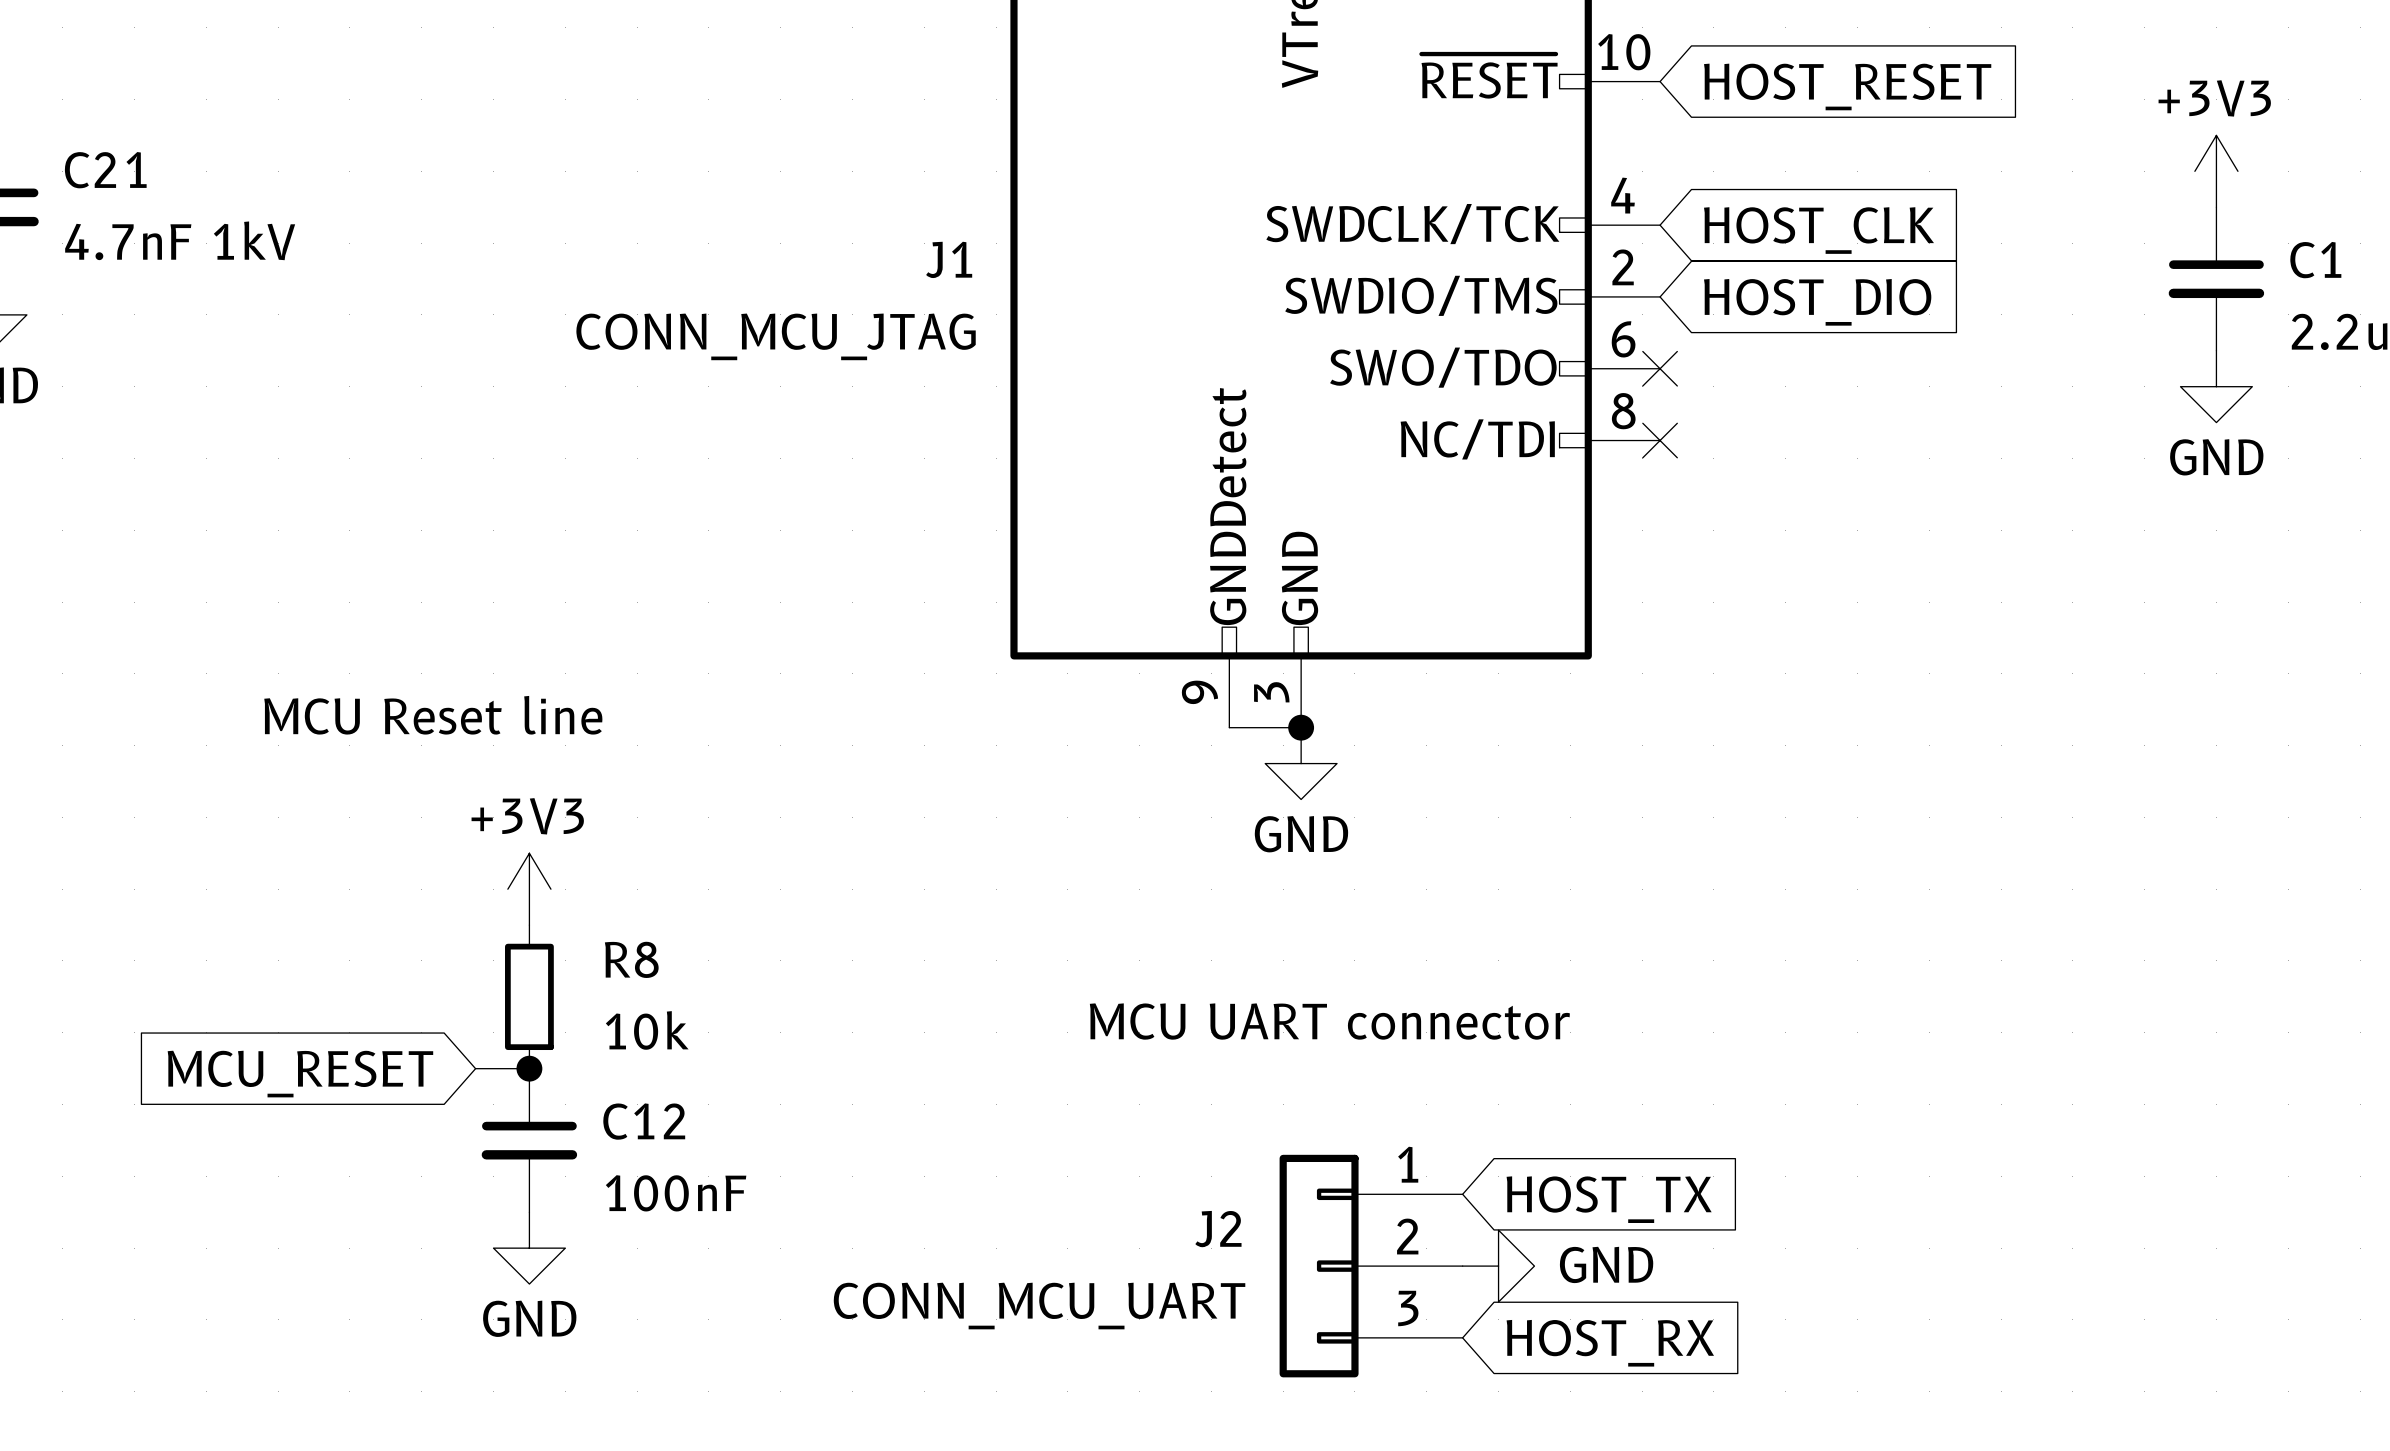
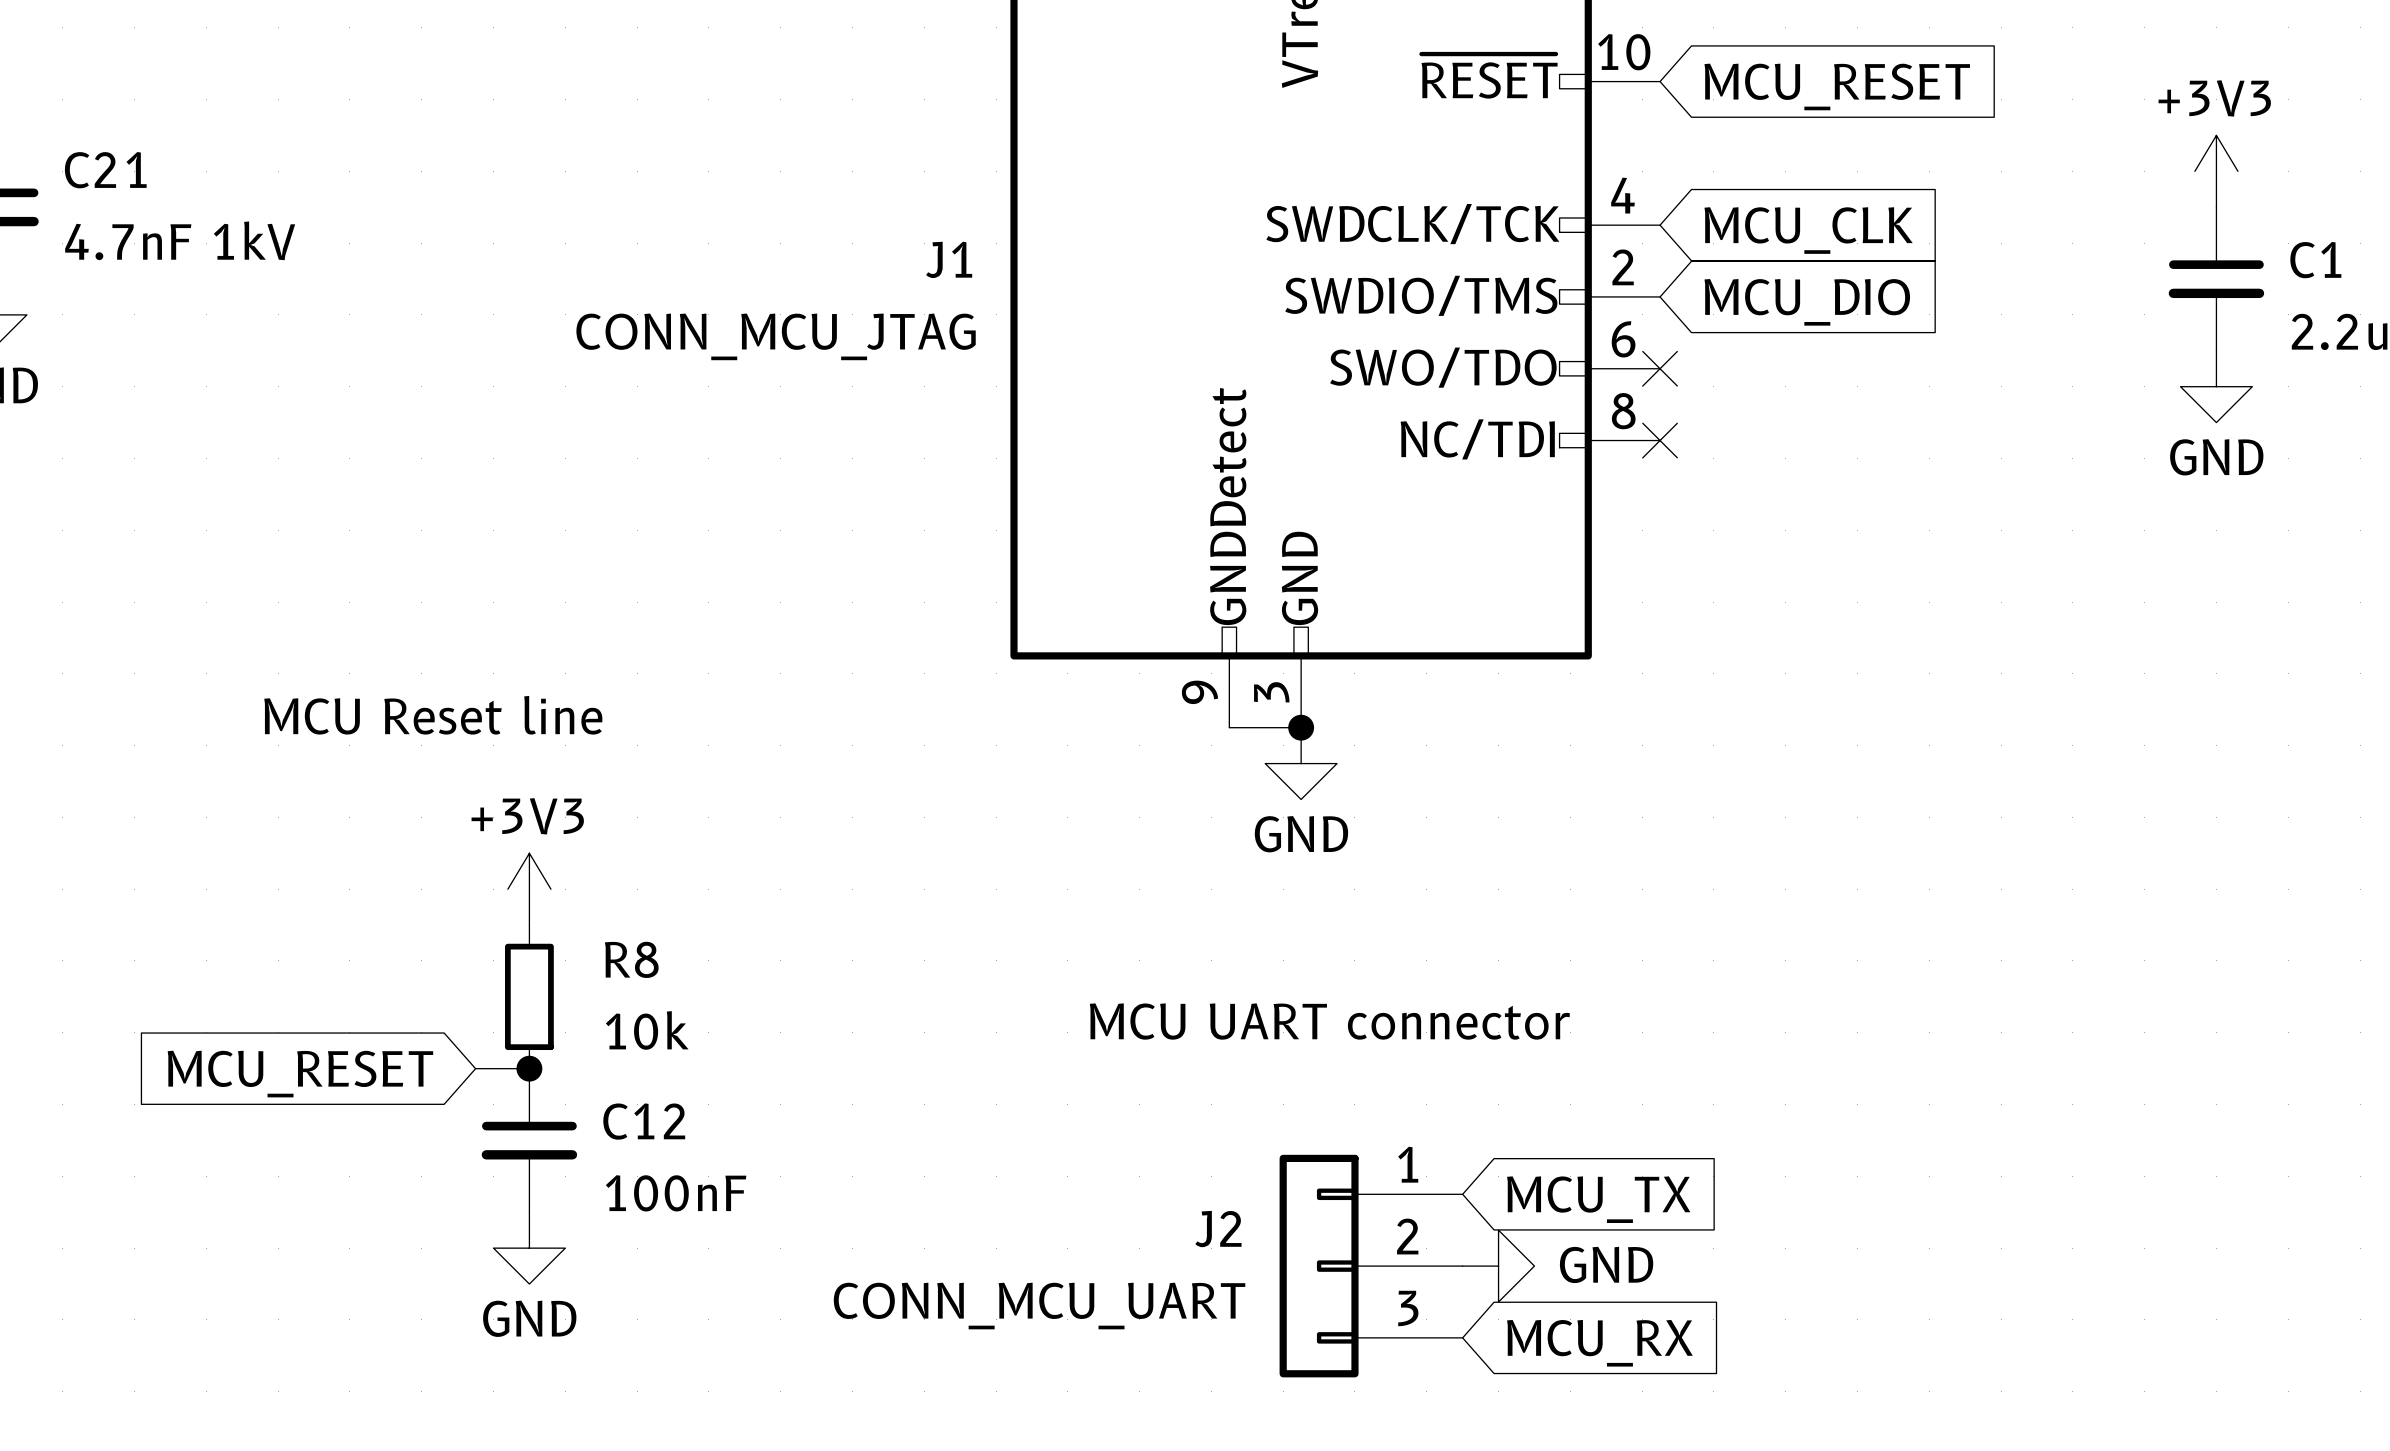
global label: HOST_RESET (1847, 86) -> MCU_RESET (1837, 86)
global label: HOST_CLK (1819, 230) -> MCU_CLK (1808, 230)
global label: HOST_DIO (1817, 302) -> MCU_DIO (1807, 302)
global label: HOST_TX (1609, 1199) -> MCU_TX (1598, 1199)
global label: HOST_RX (1610, 1343) -> MCU_RX (1599, 1343)

